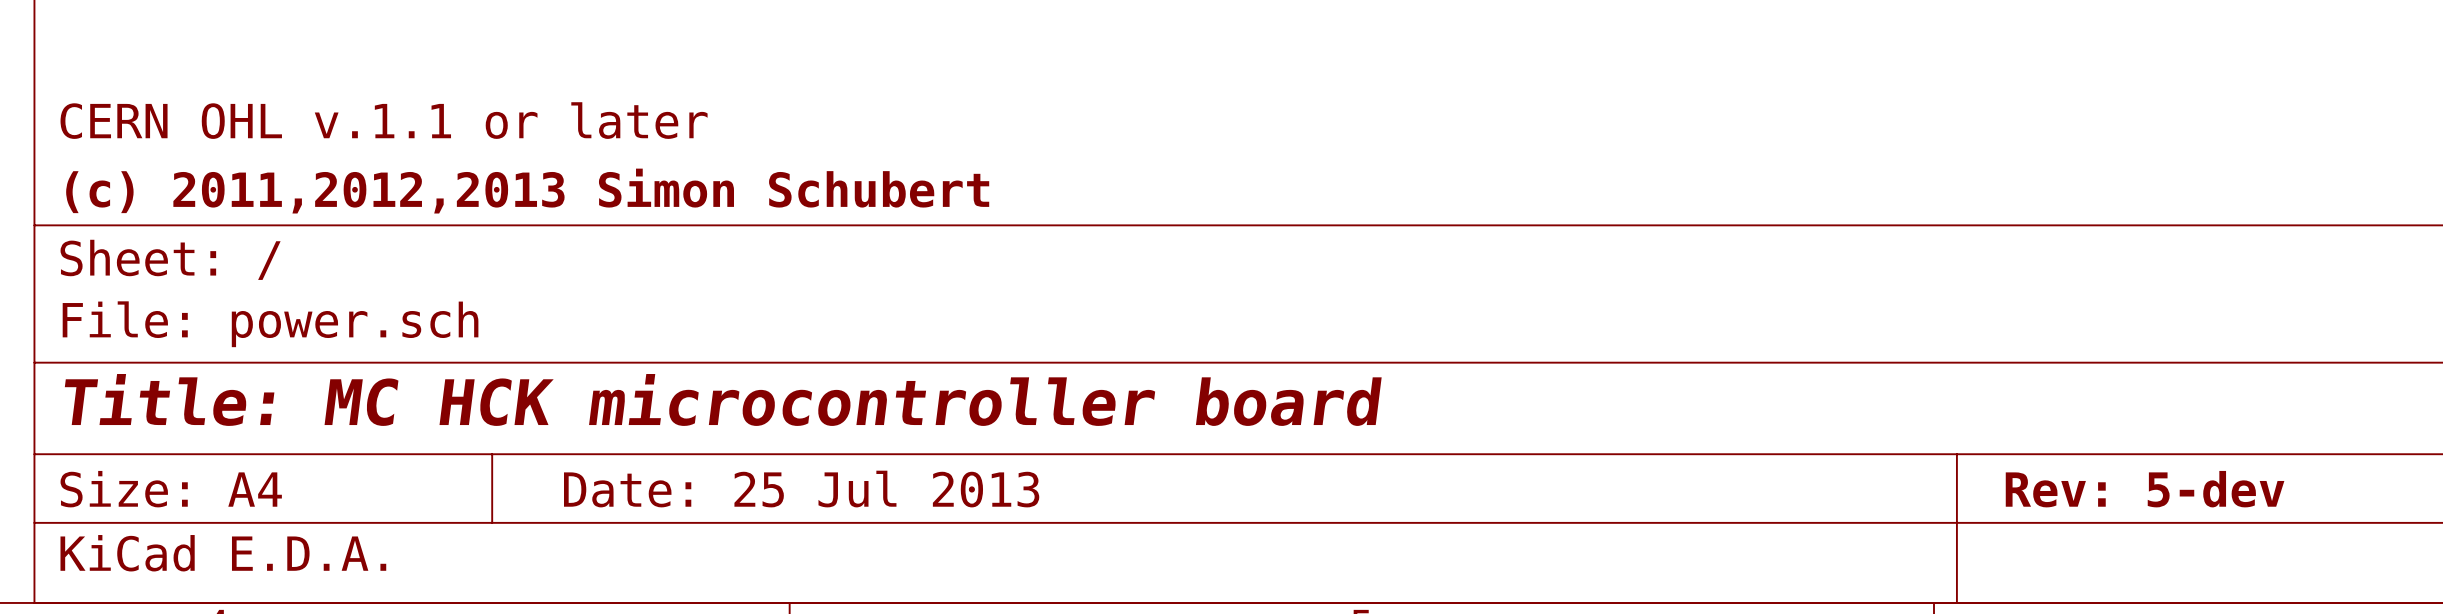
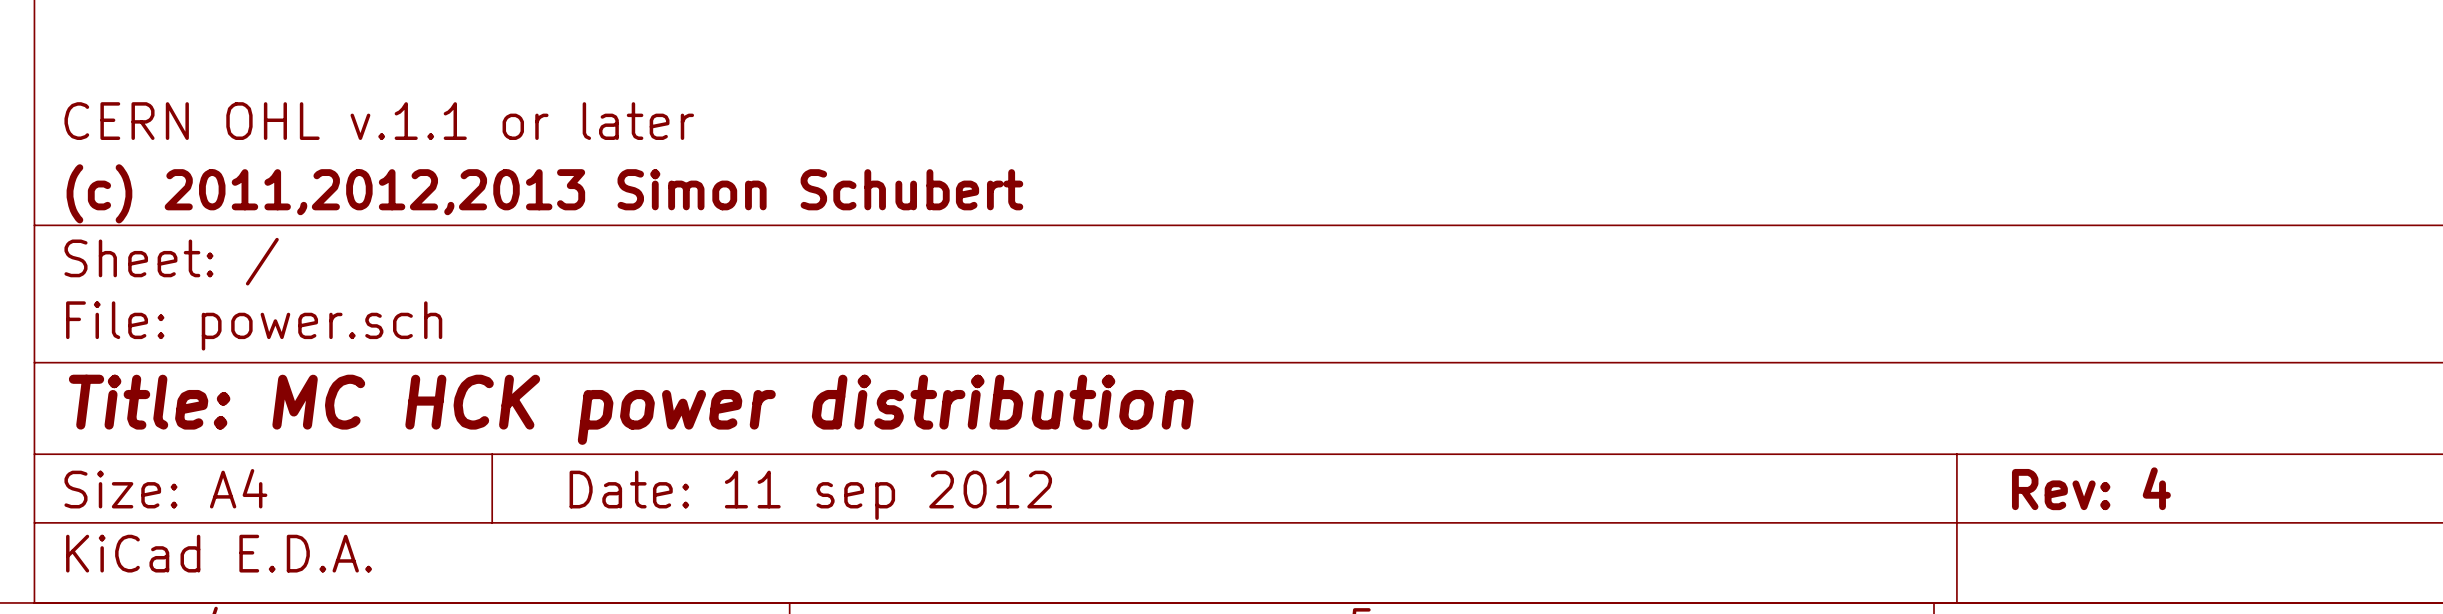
title block: Title: MC HCK microcontroller board (723, 399) -> Title: MC HCK power distribution (631, 409)
title block: Date: 25 Jul 2013 (801, 489) -> Date: 11 sep 2012 (810, 495)
title block: Rev: 5-dev (2145, 489) -> Rev: 4 (2091, 488)

